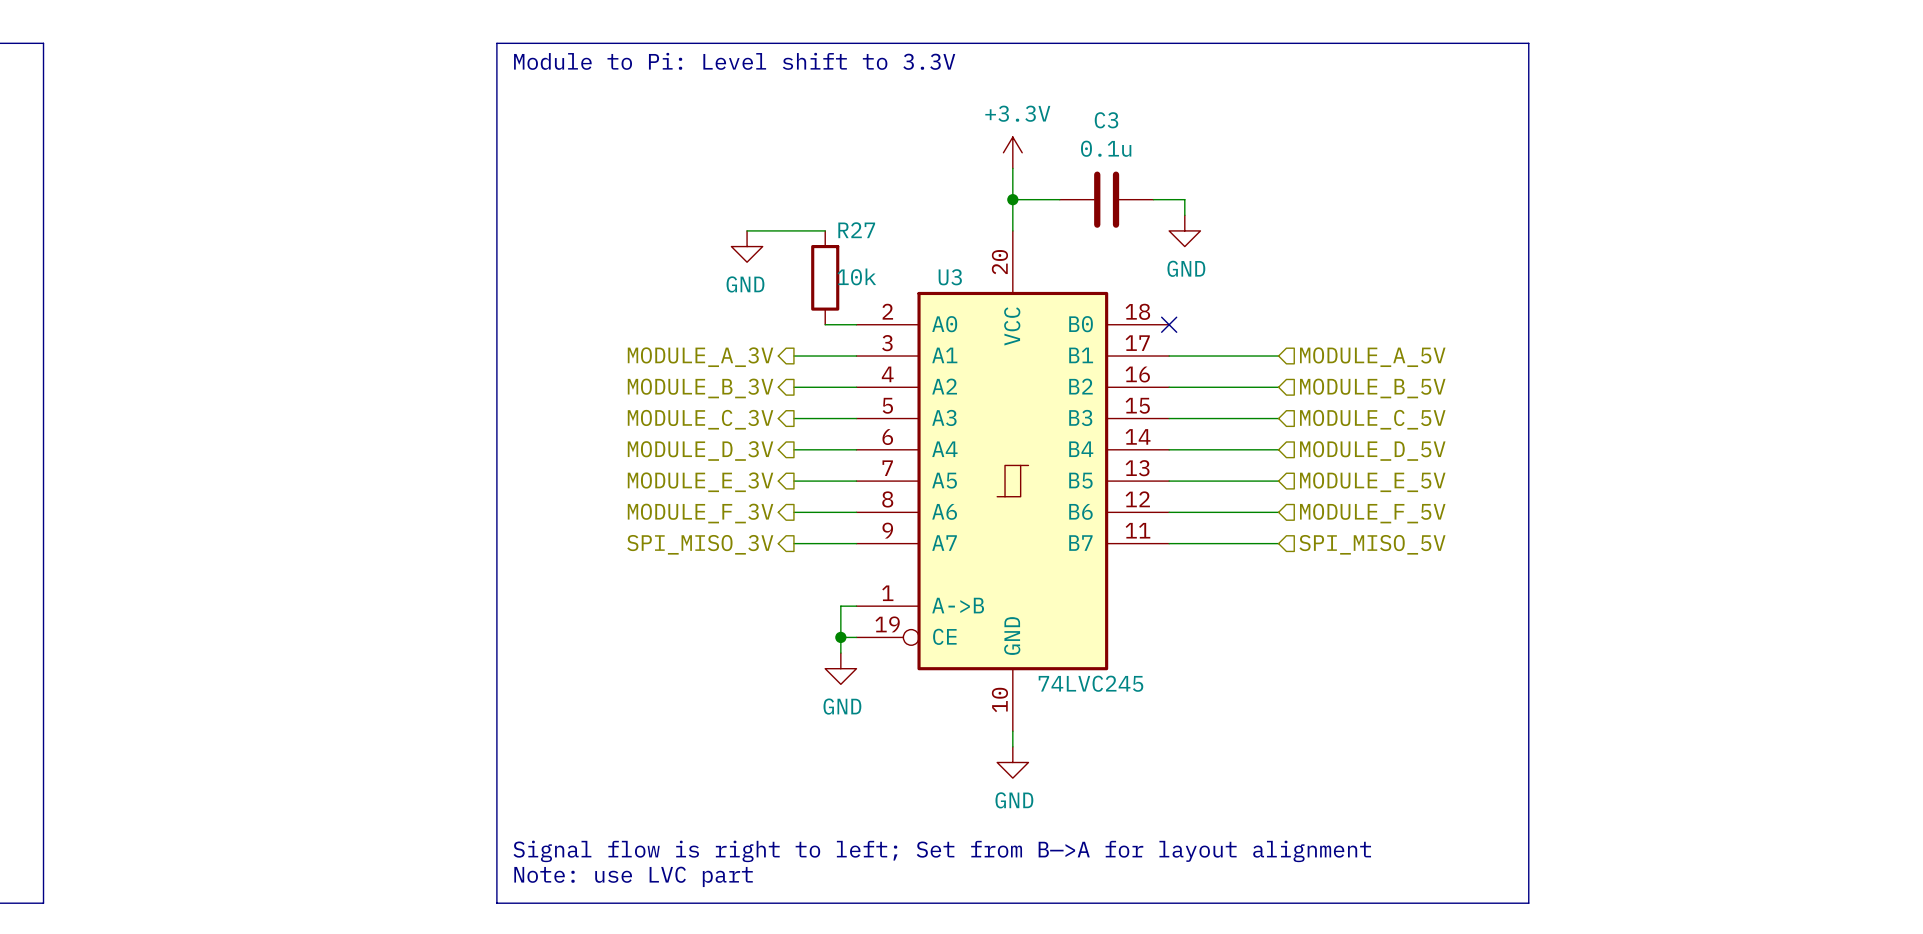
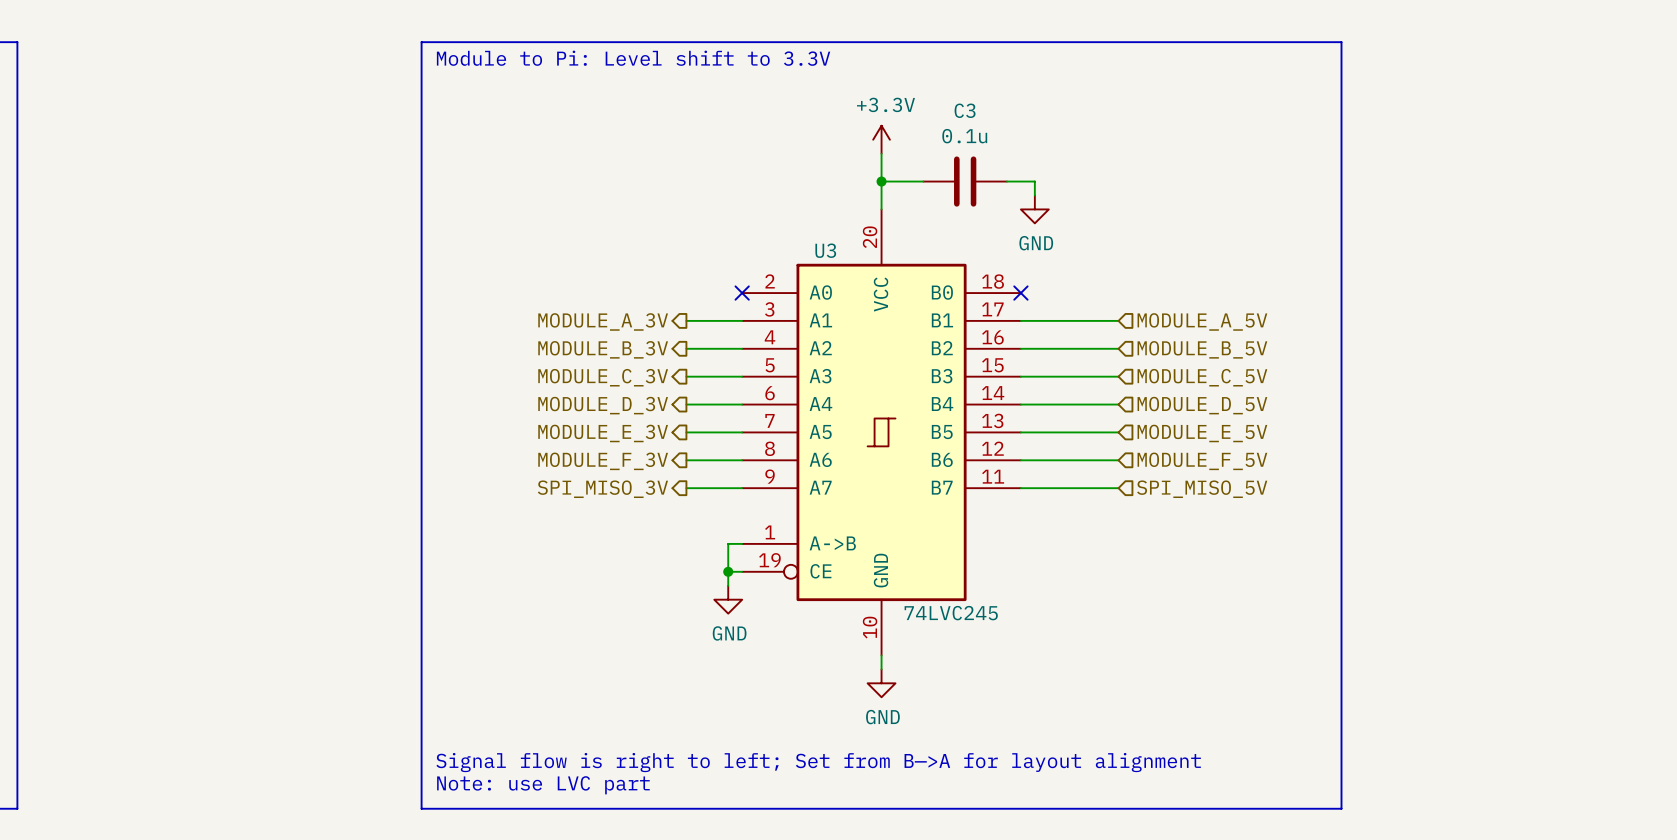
wire: (747, 230) (825, 230) -> none
power symbol: GND (747, 246) -> none
R27: 10k (825, 277) -> none
wire: (825, 324) (856, 324) -> none
no-connect mark: none -> (742, 293)

